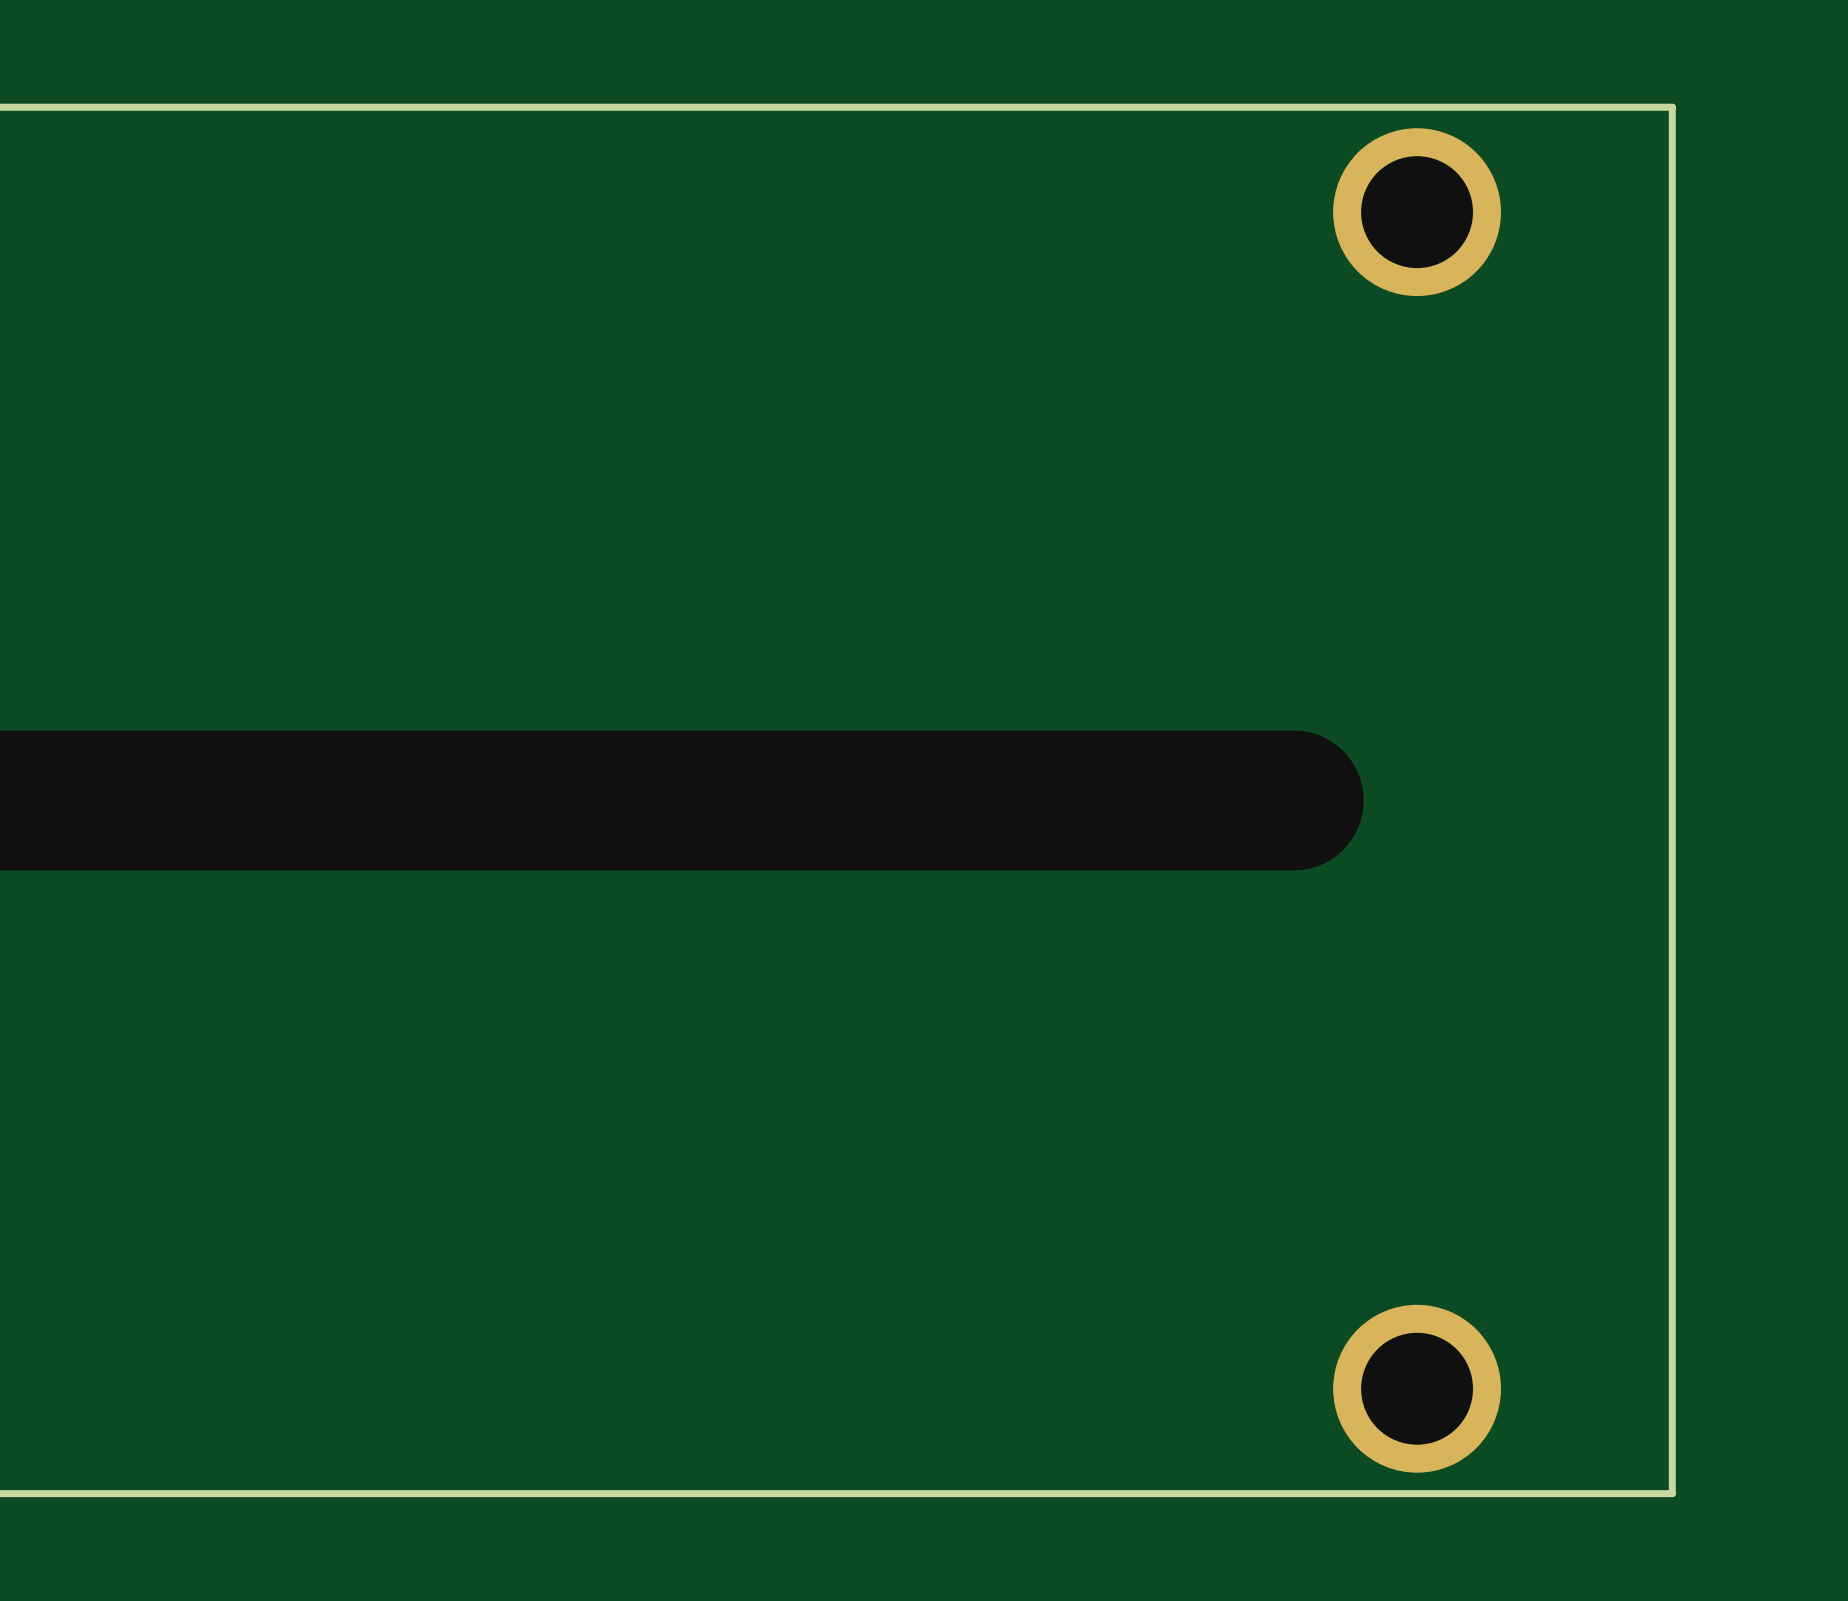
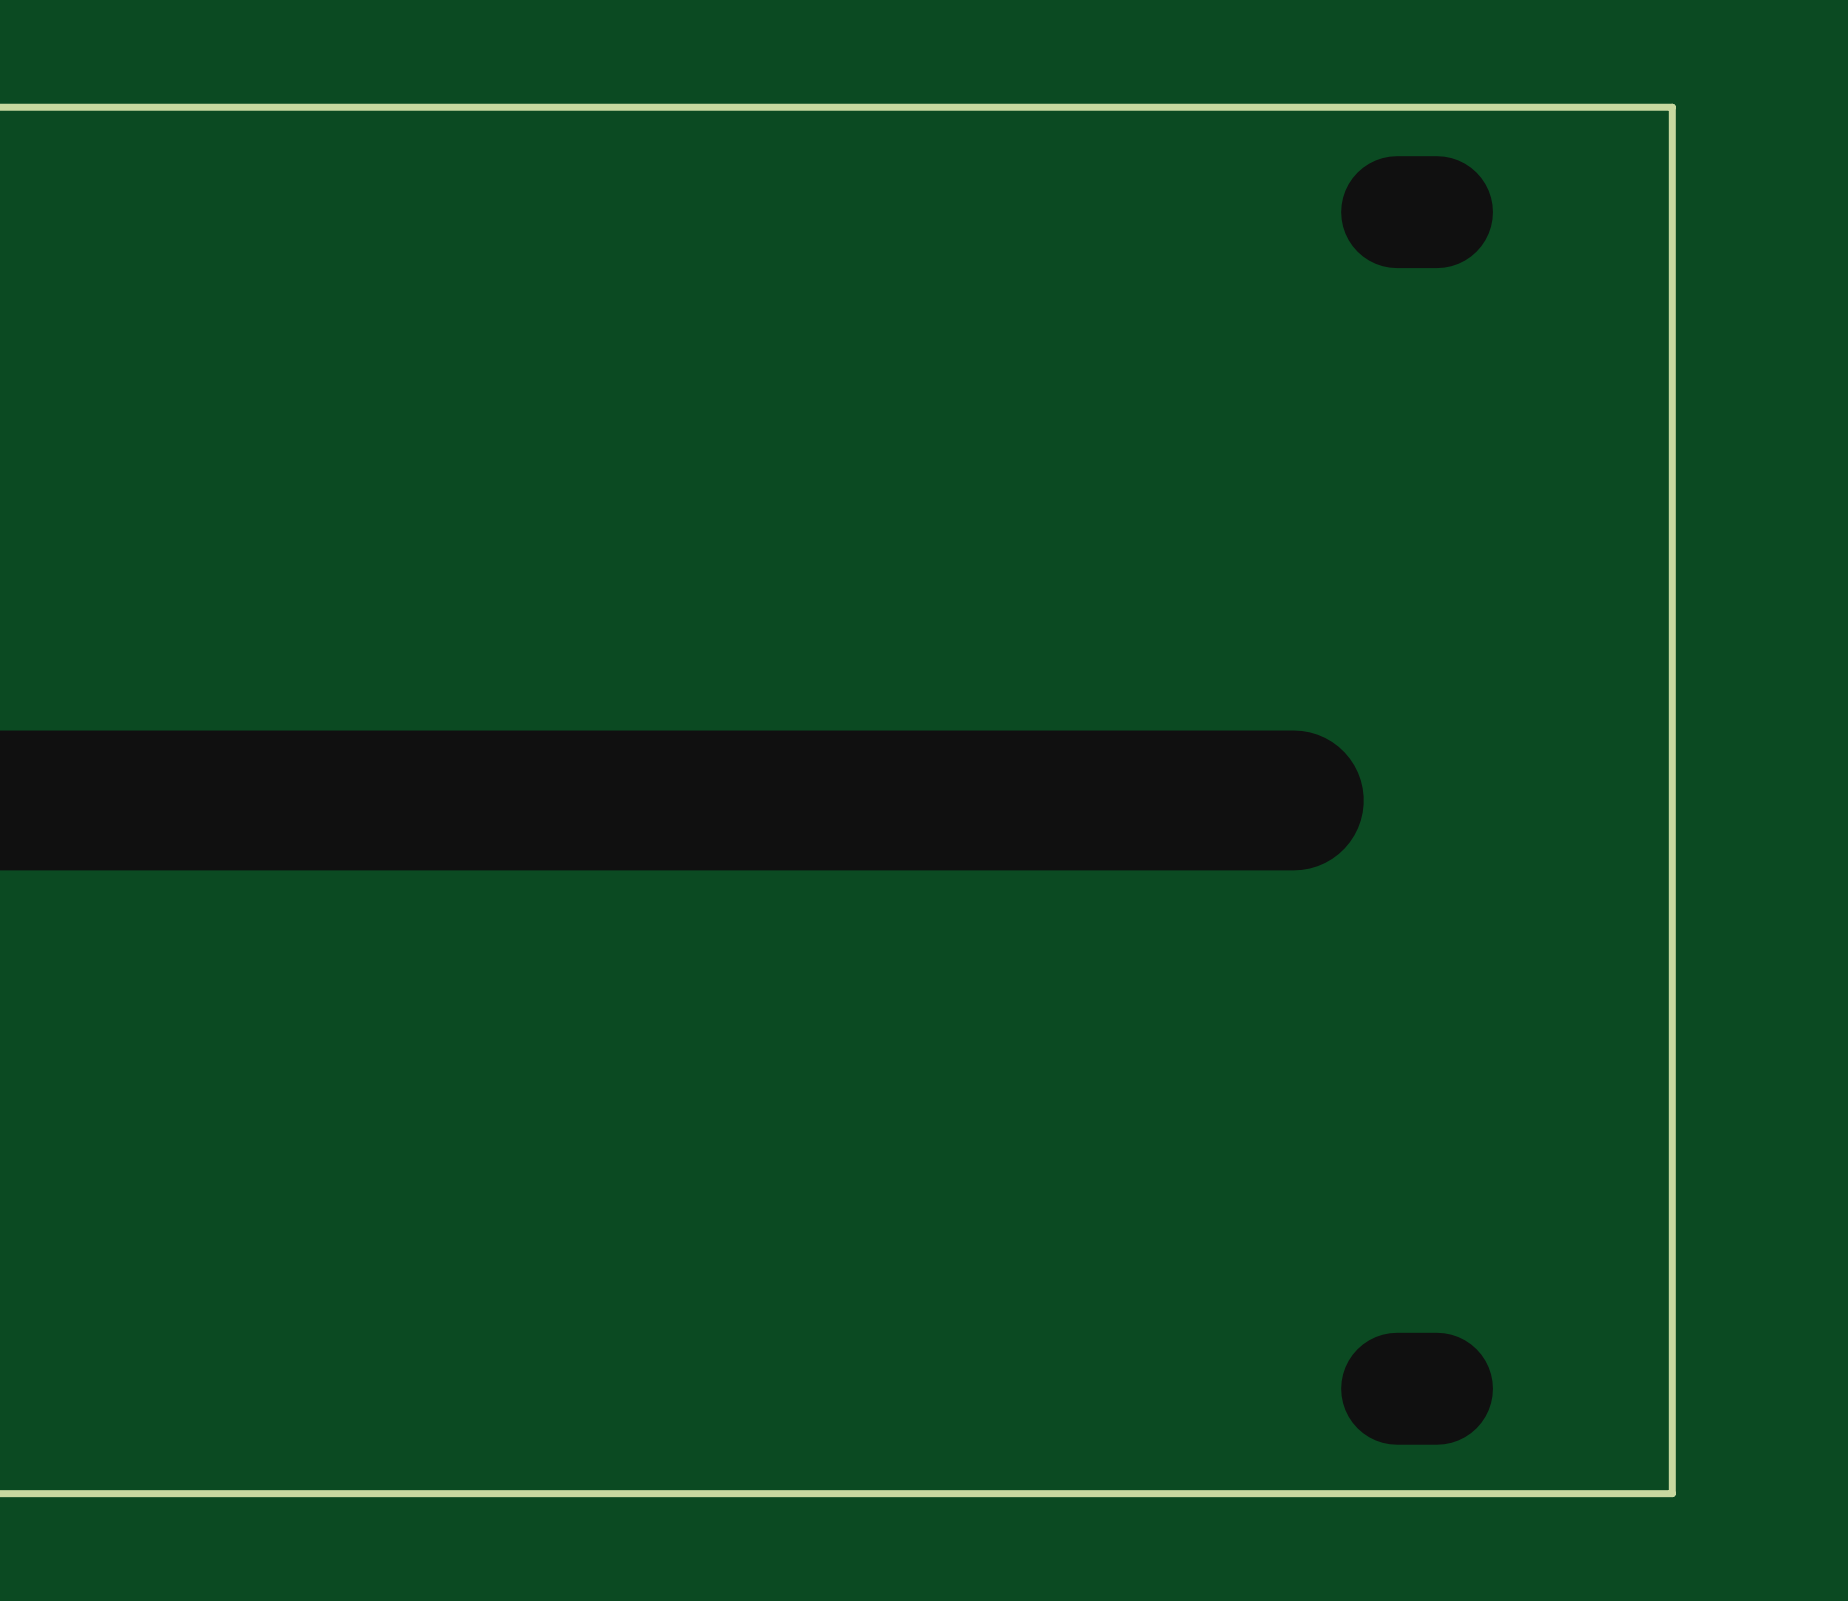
part footprint: [1333, 128, 1501, 297] -> [1341, 156, 1493, 269]
part footprint: [1333, 1304, 1501, 1473] -> [1341, 1332, 1493, 1445]

